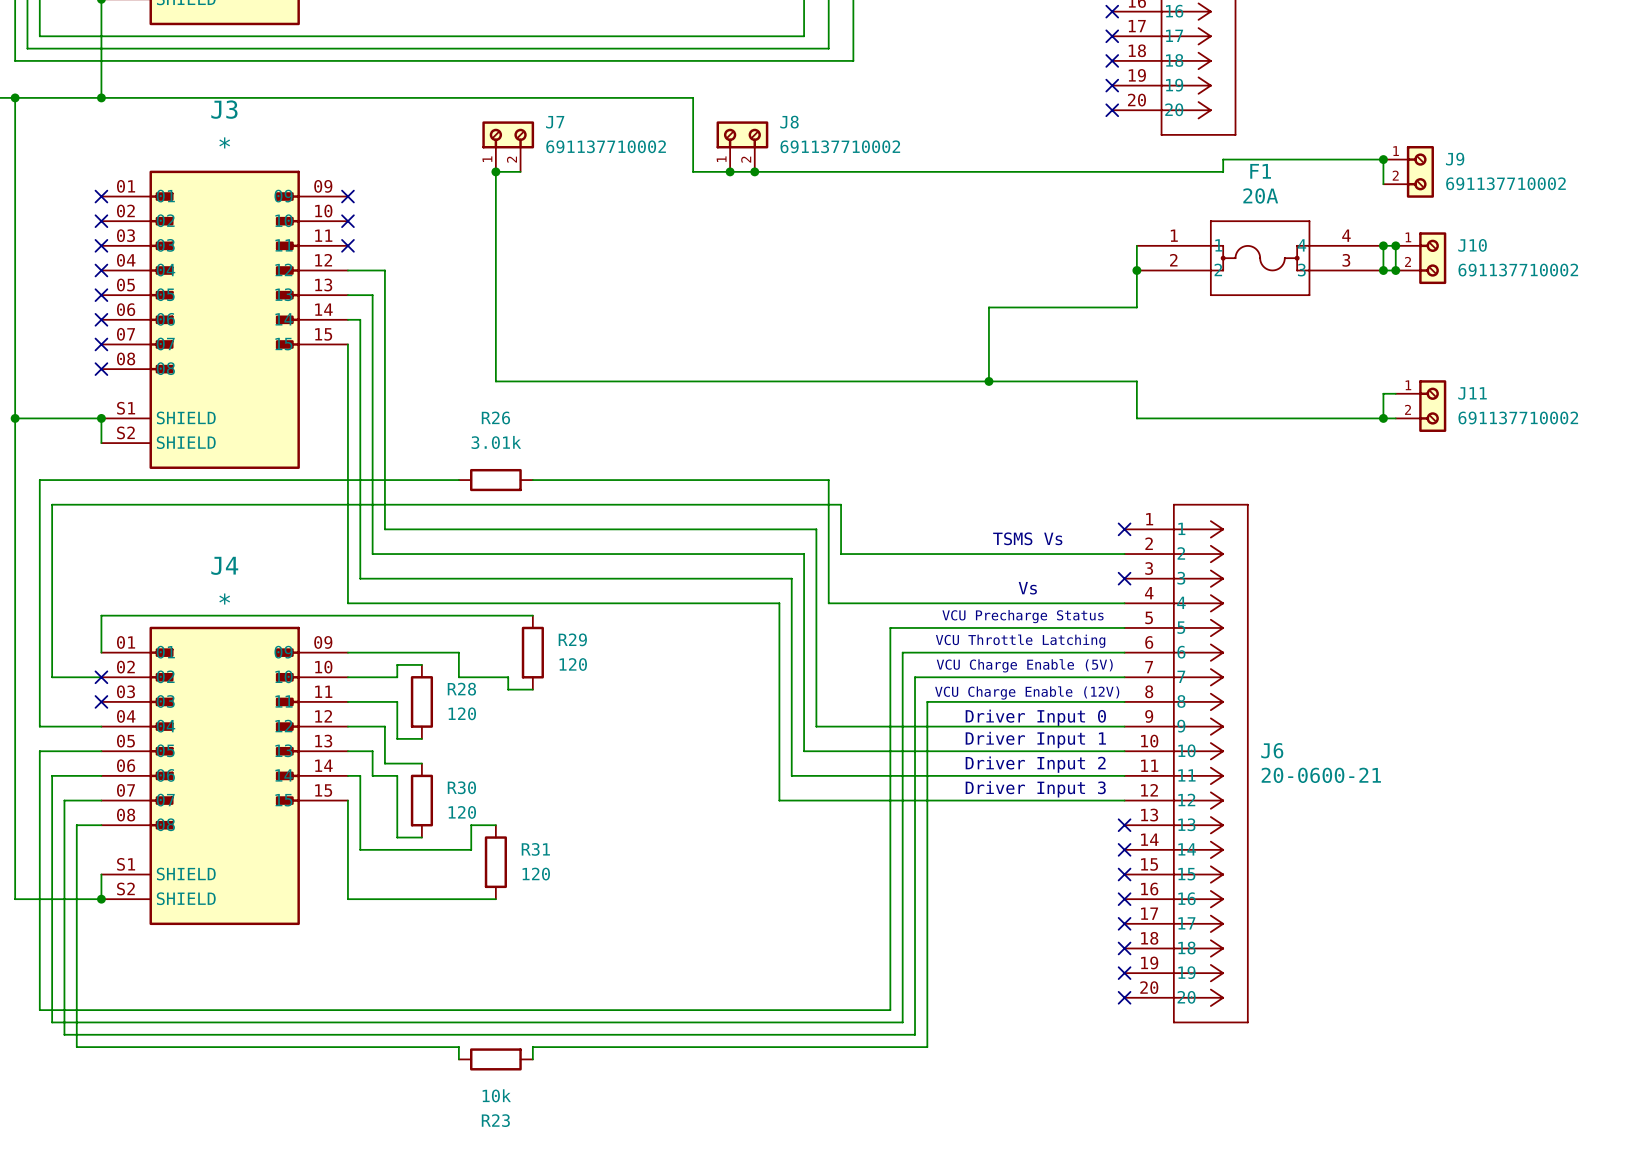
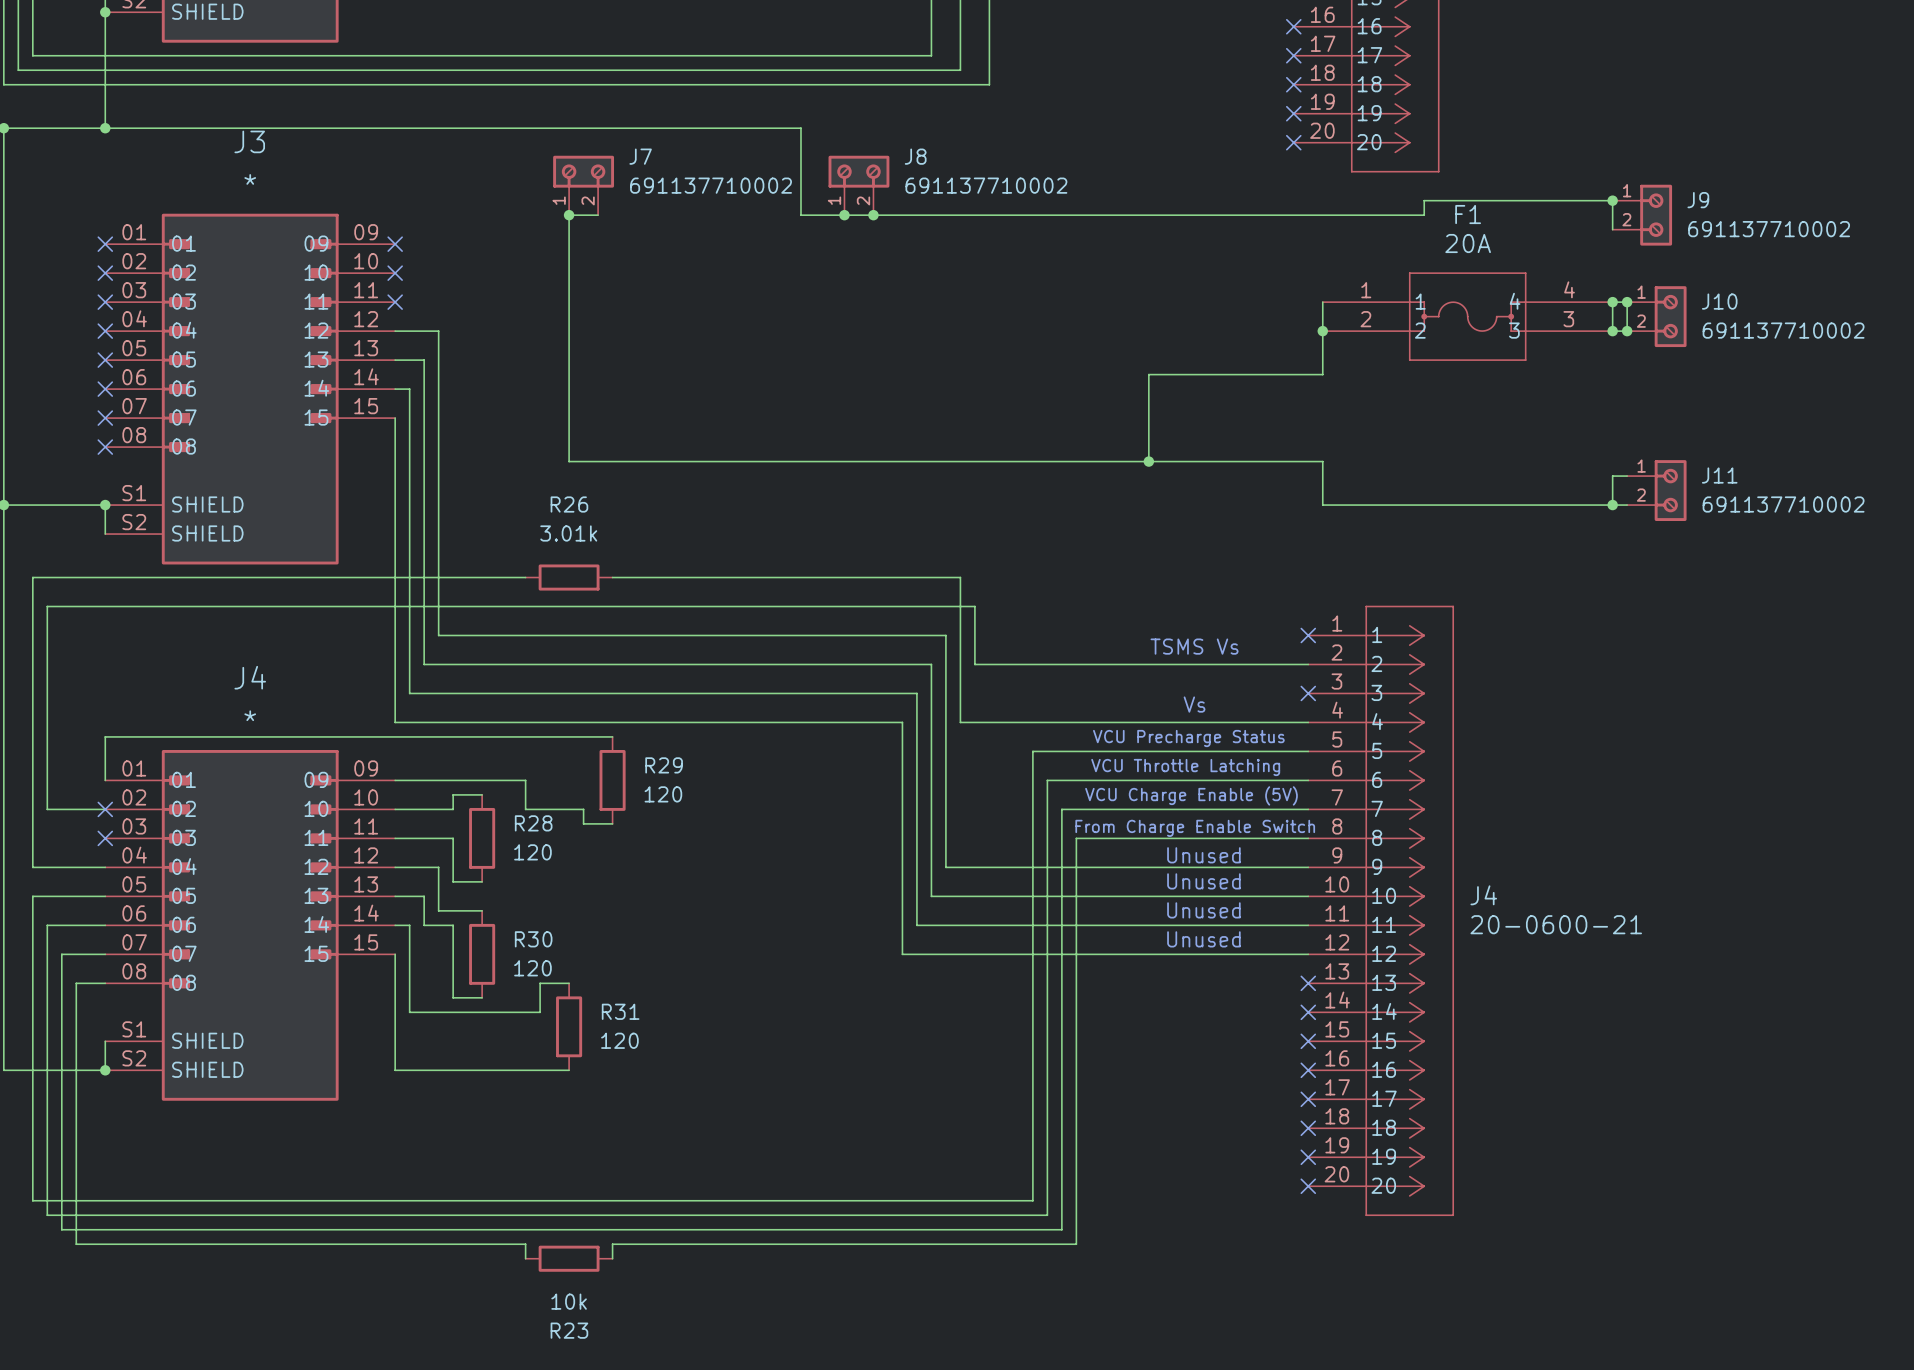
text: VCU Charge Enable (12V) (1027, 692) -> From Charge Enable Switch (1195, 828)
text: Driver Input 0 (1035, 717) -> Unused (1203, 855)
text: Driver Input 1 (1035, 740) -> Unused (1203, 881)
J6 name: J6 (1272, 750) -> J4 (1483, 895)
text: Driver Input 2 (1035, 764) -> Unused (1203, 910)
text: Driver Input 3 (1035, 789) -> Unused (1203, 939)

